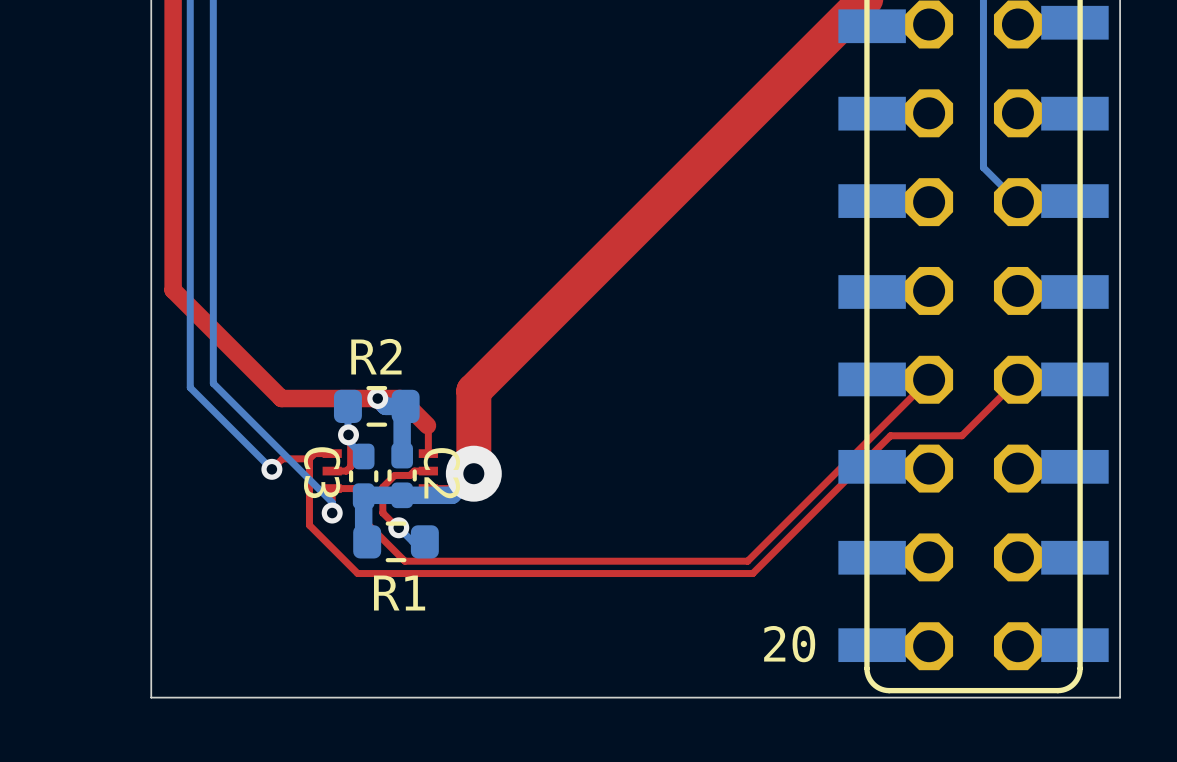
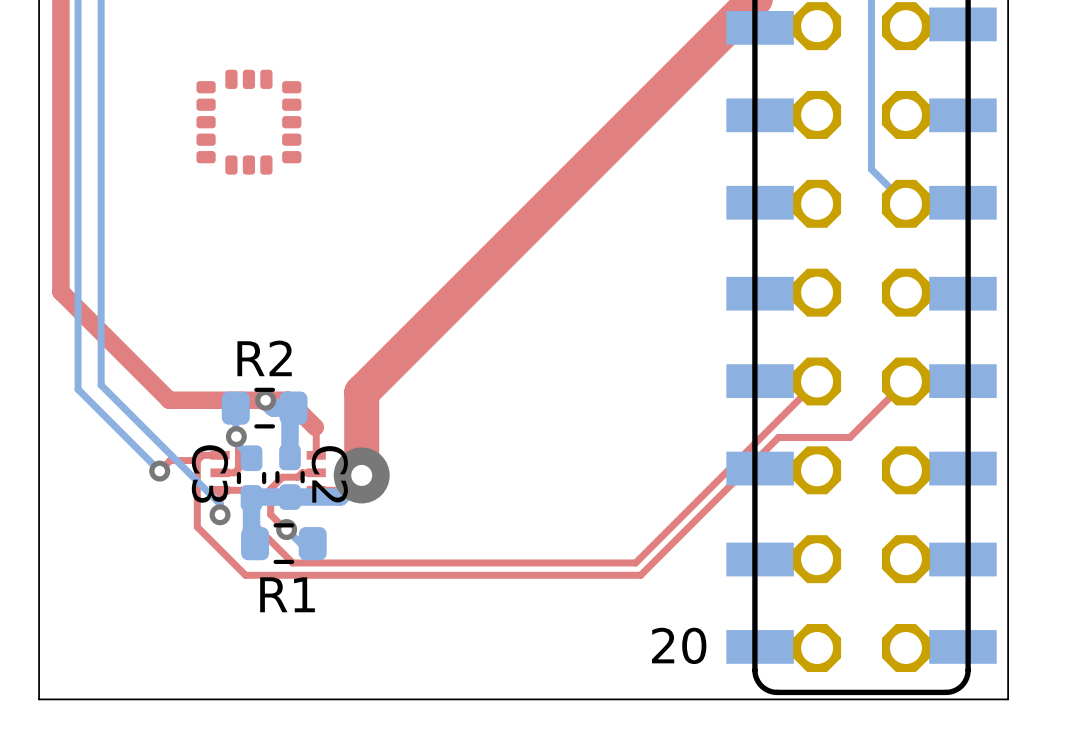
part: none -> (248, 122)

